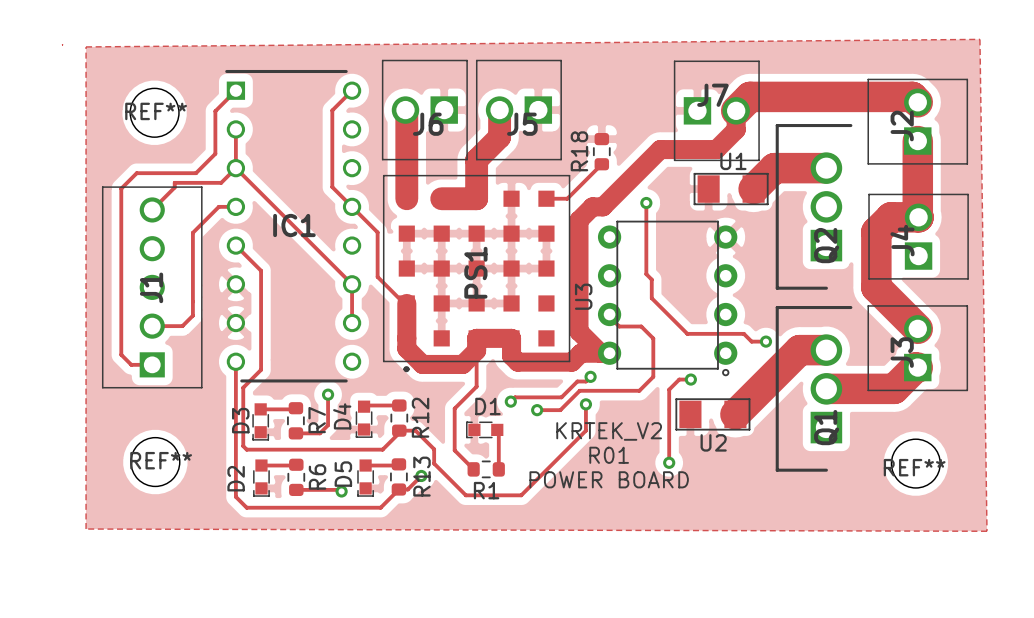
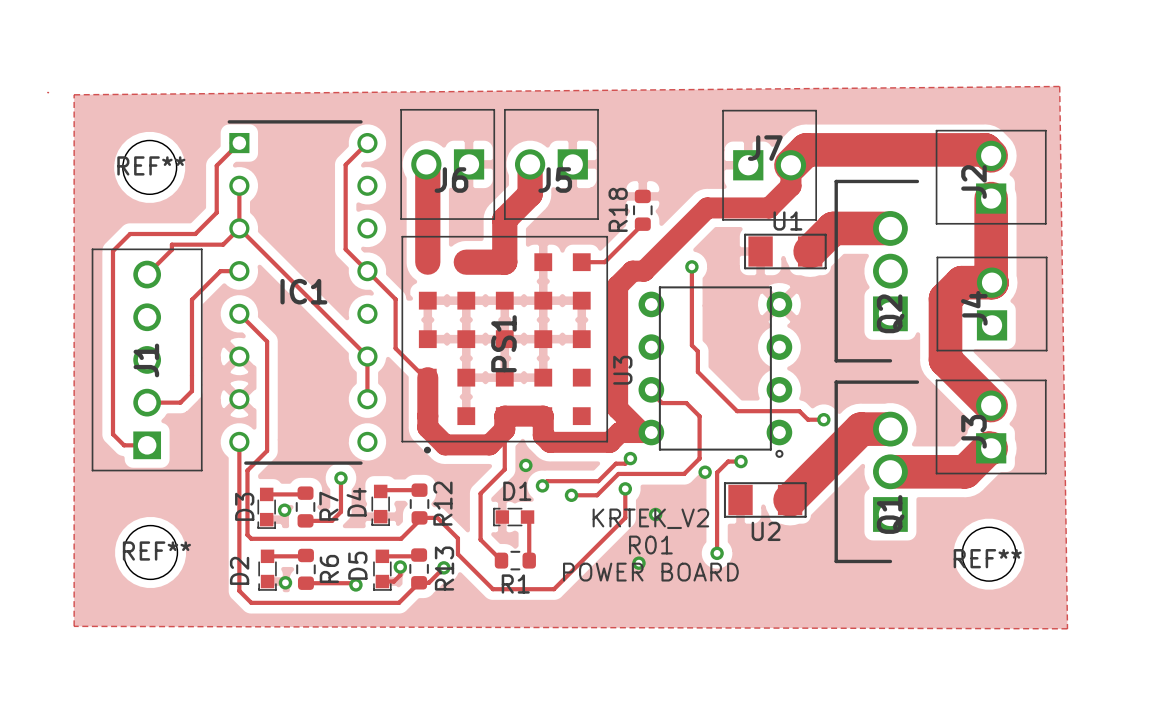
via: none -> (525, 465)
via: none -> (705, 472)
via: none -> (284, 510)
via: none -> (655, 514)
via: none -> (638, 563)
track: none -> (400, 567) (400, 575) (393, 581) (382, 581)
via: none -> (400, 567)
via: none -> (285, 582)

